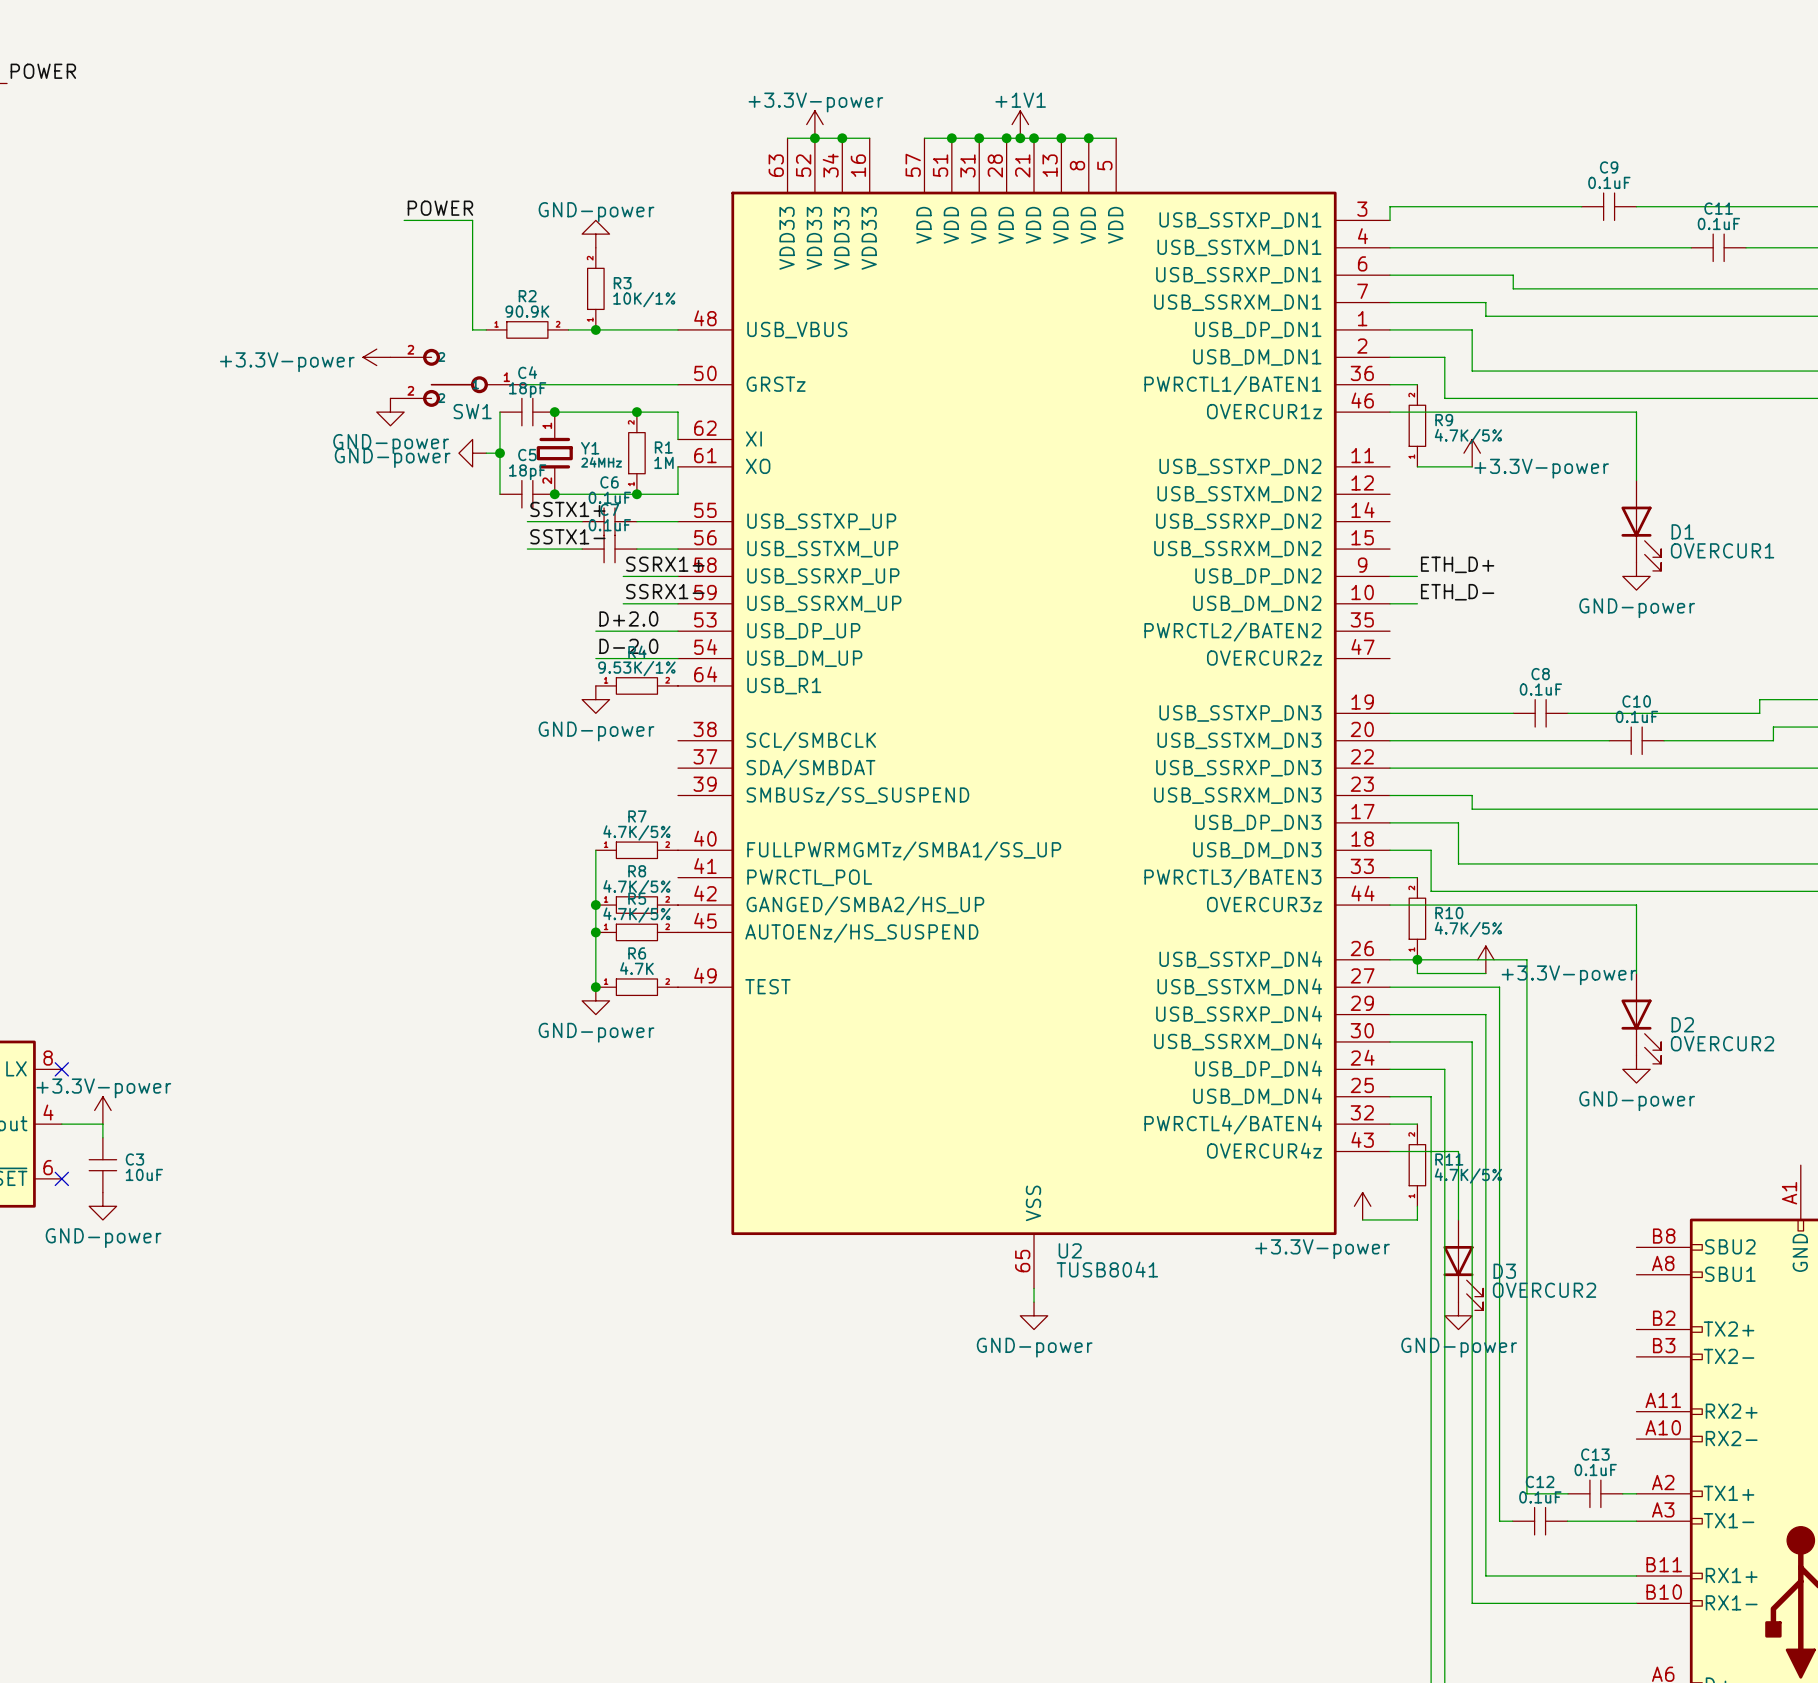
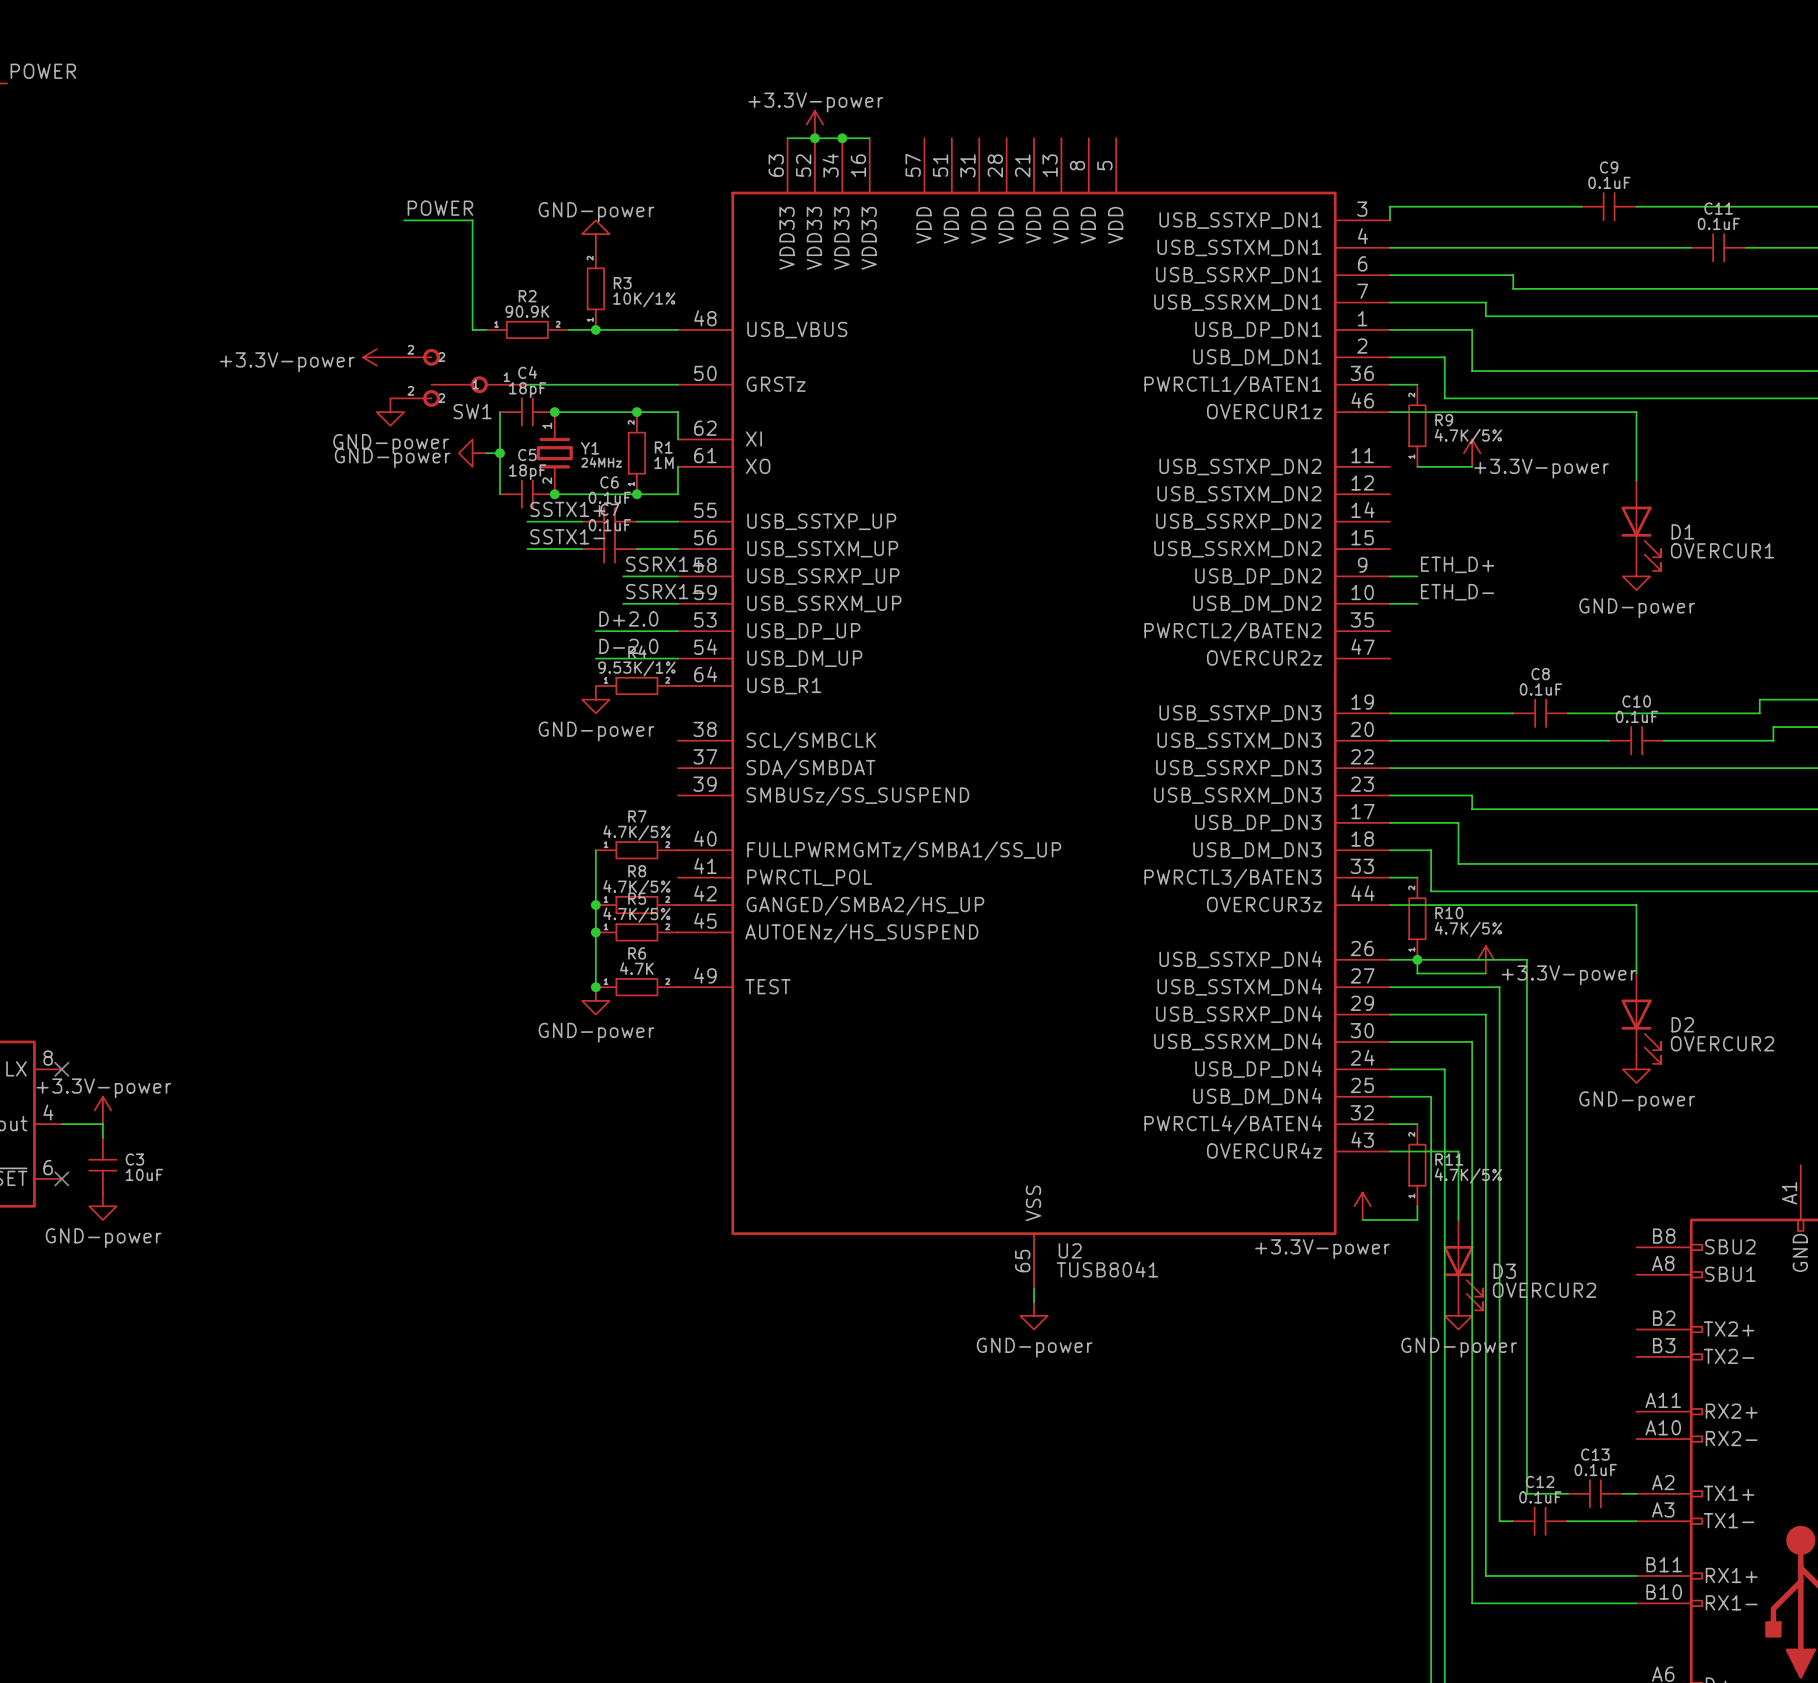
power symbol: +1V1 (1020, 124) -> none
wire: (924, 138) (1116, 138) -> none
junction: (951, 138) -> none
junction: (979, 138) -> none
junction: (1006, 138) -> none
junction: (1020, 138) -> none
junction: (1034, 138) -> none
junction: (1061, 138) -> none
junction: (1088, 138) -> none

